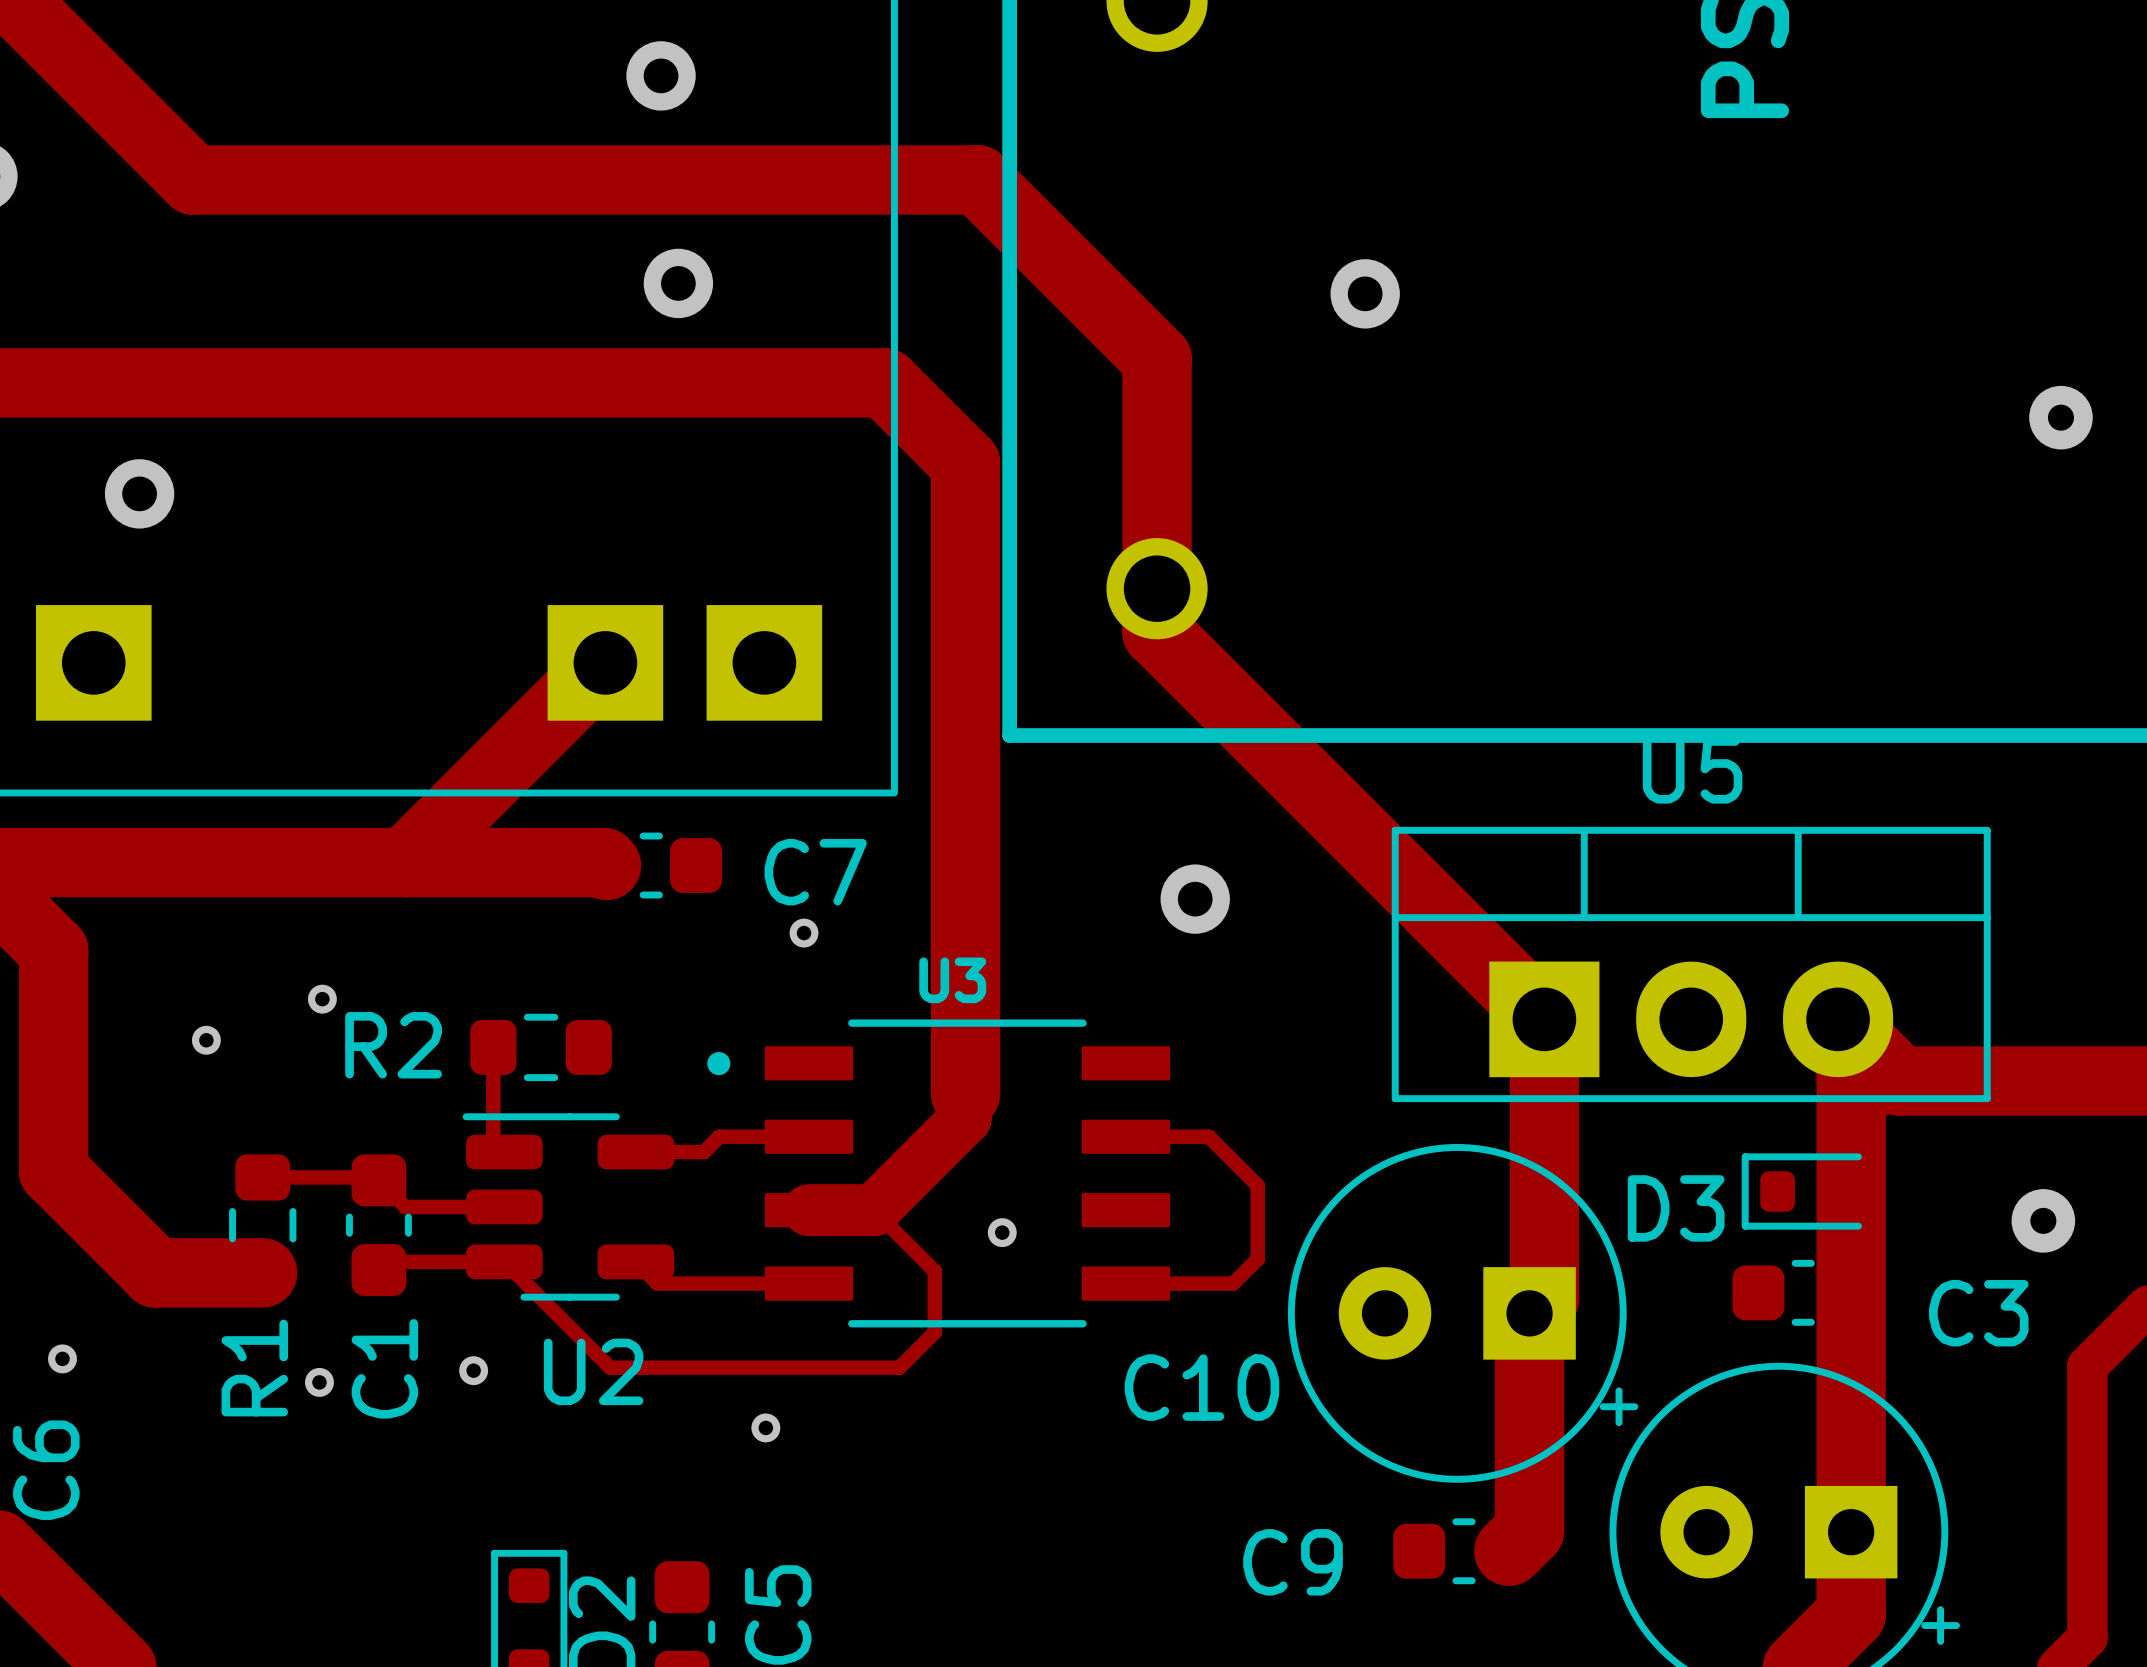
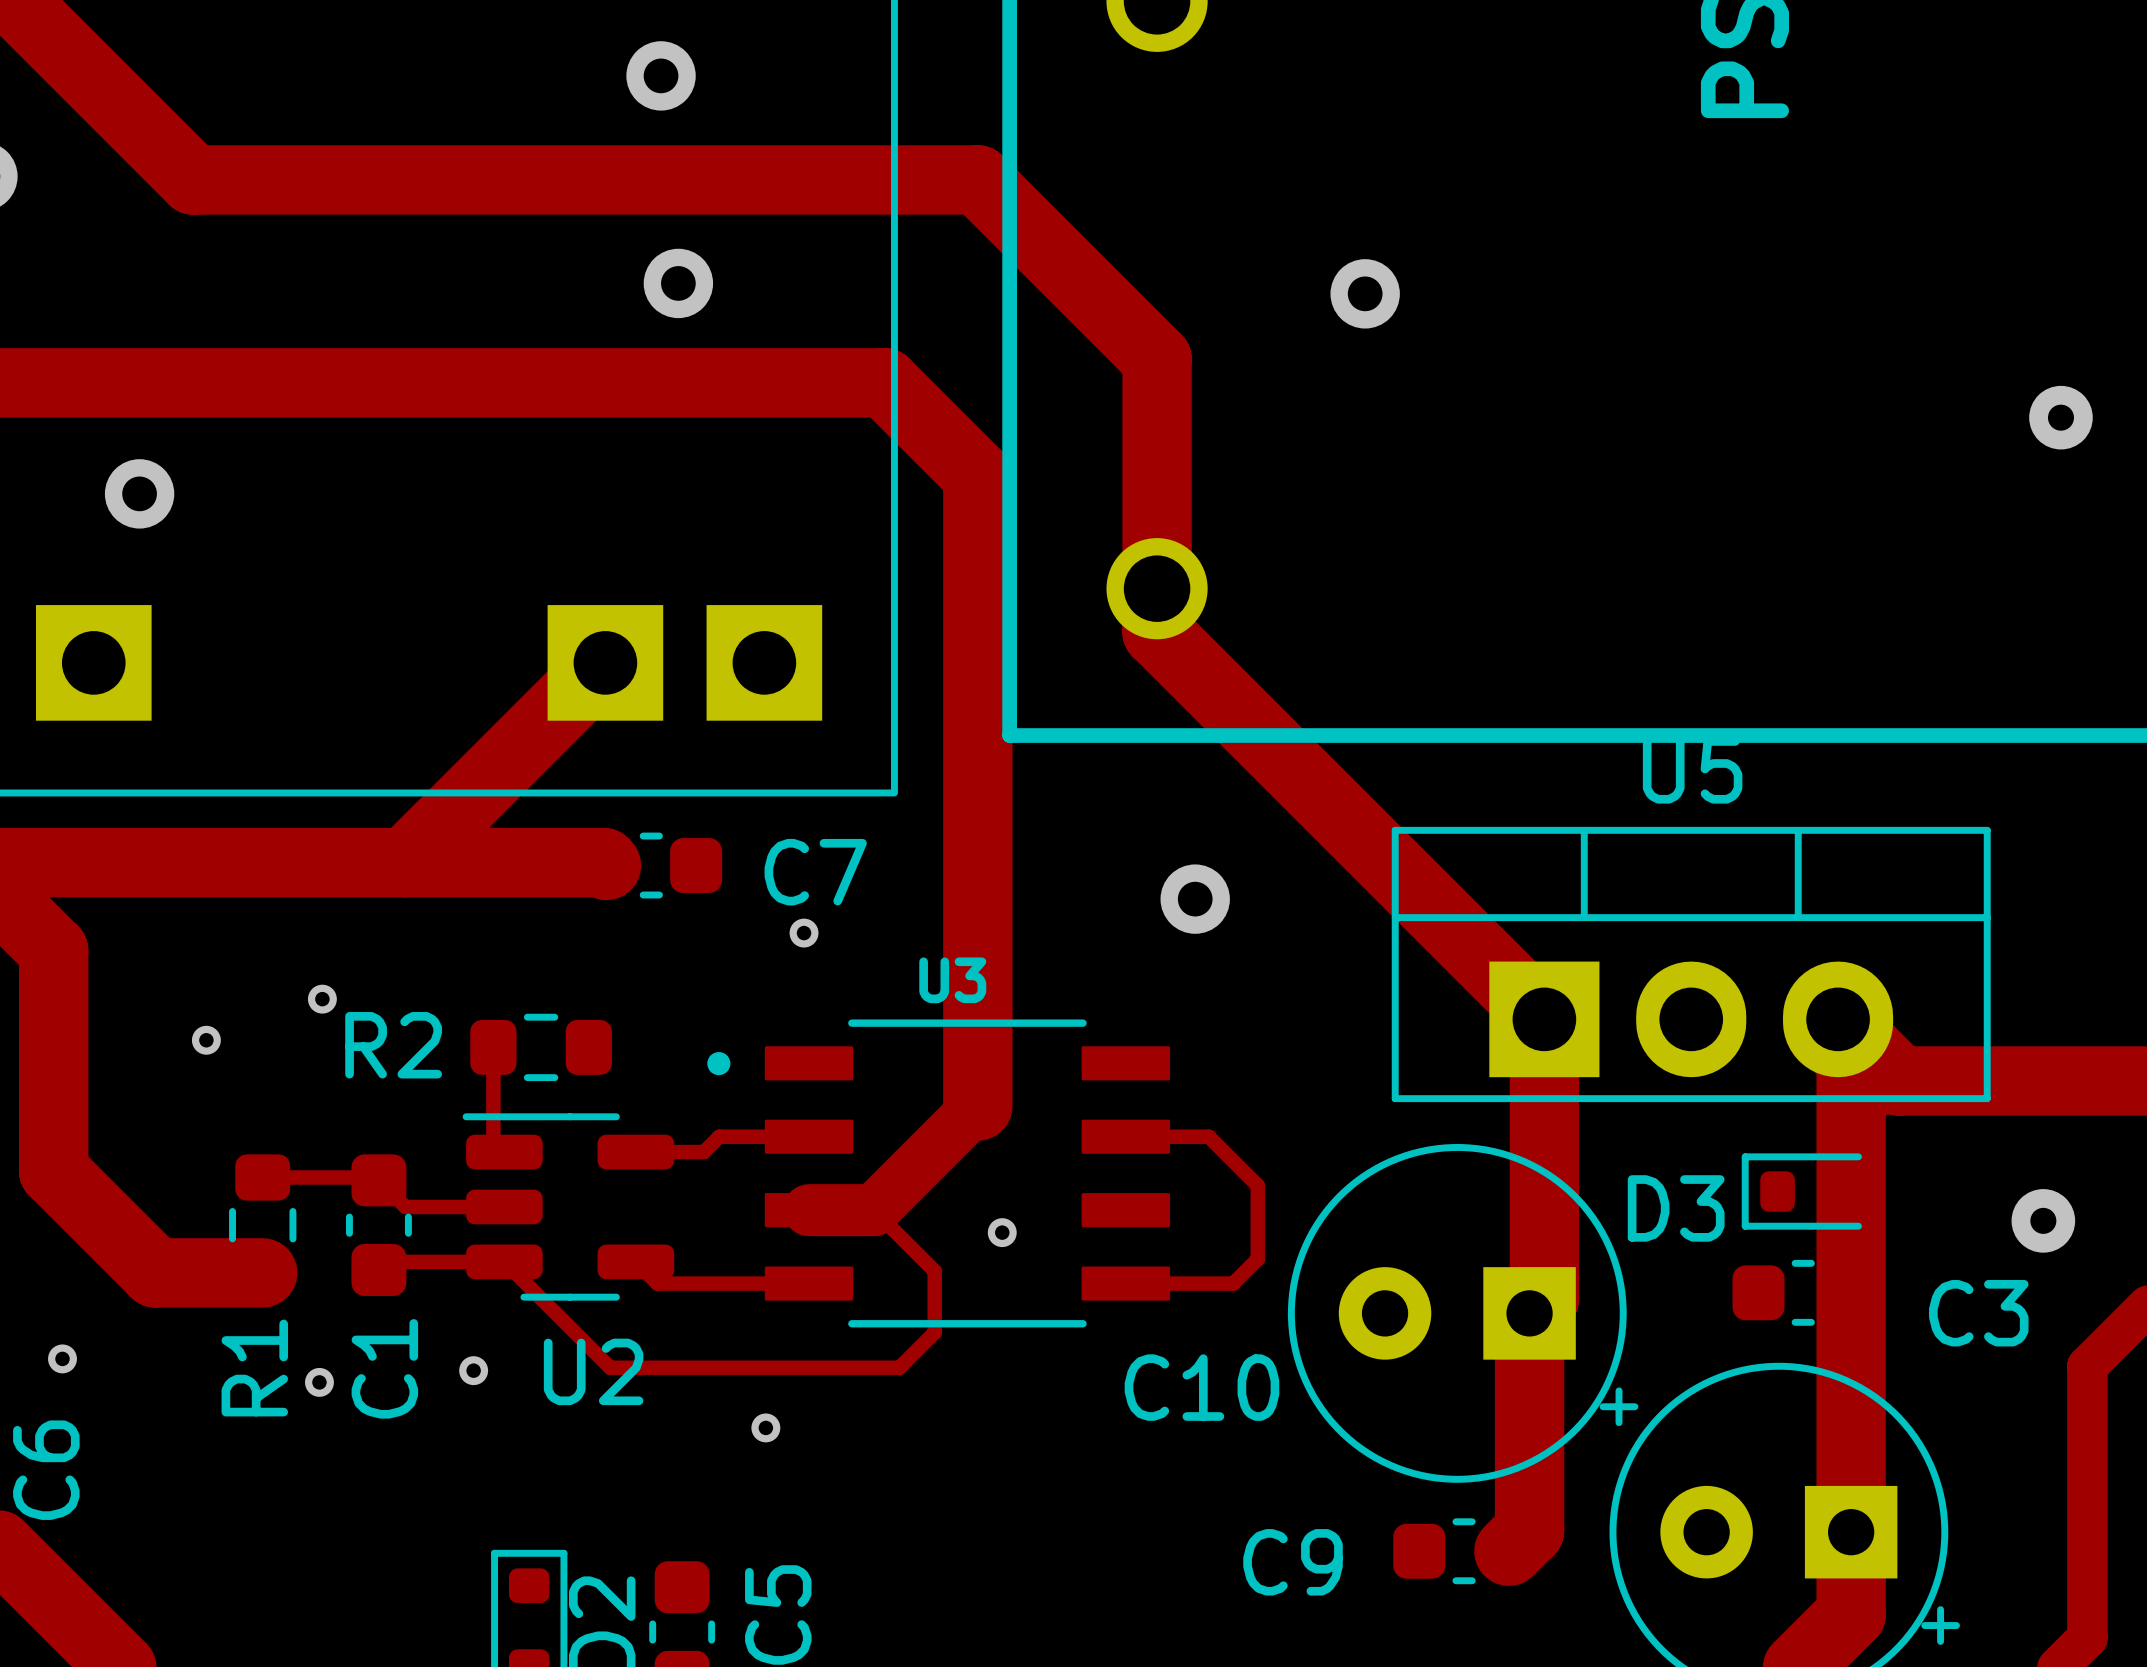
top track: (965, 463) (965, 1118) -> (965, 463) (977, 475) (977, 1106) (965, 1118)

